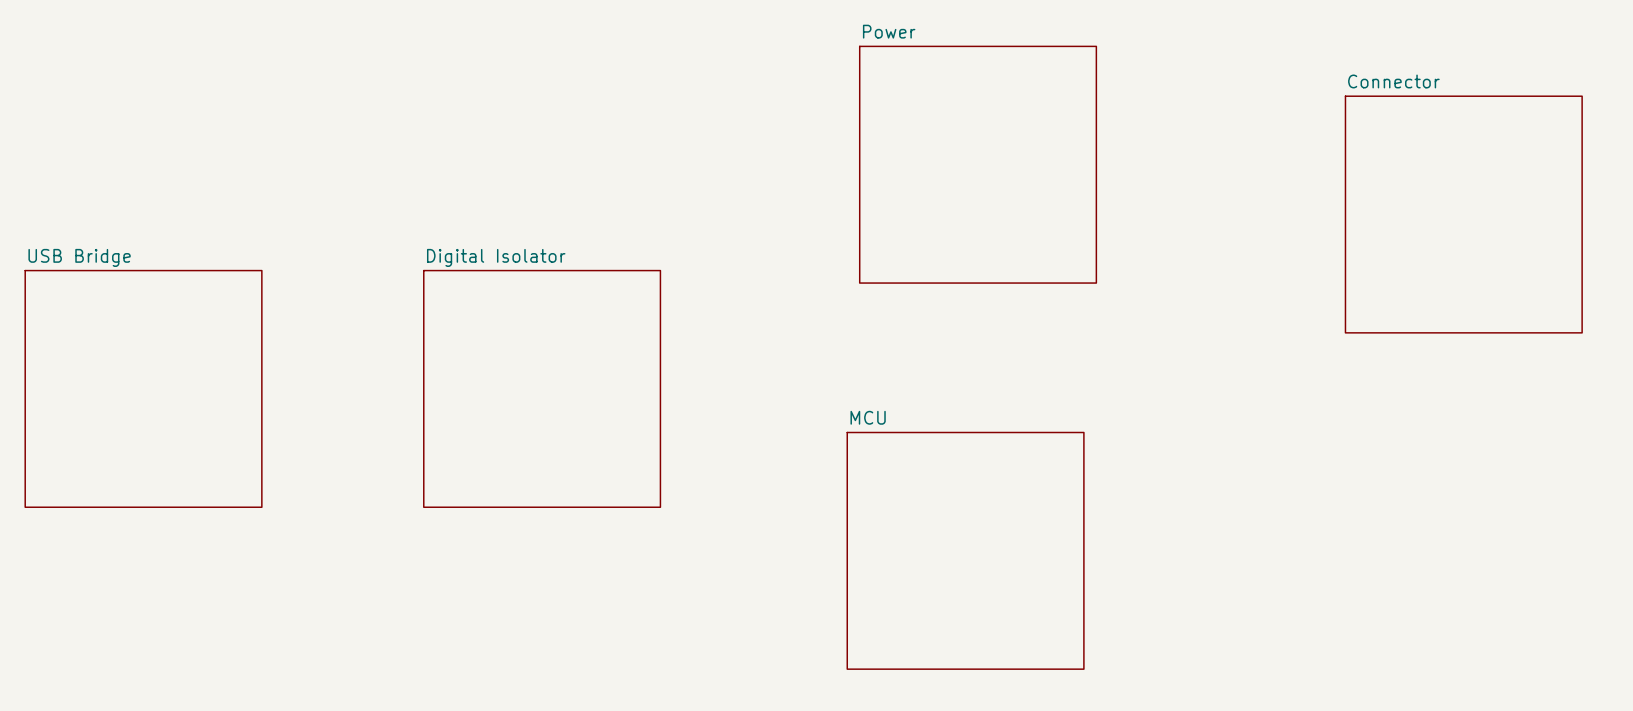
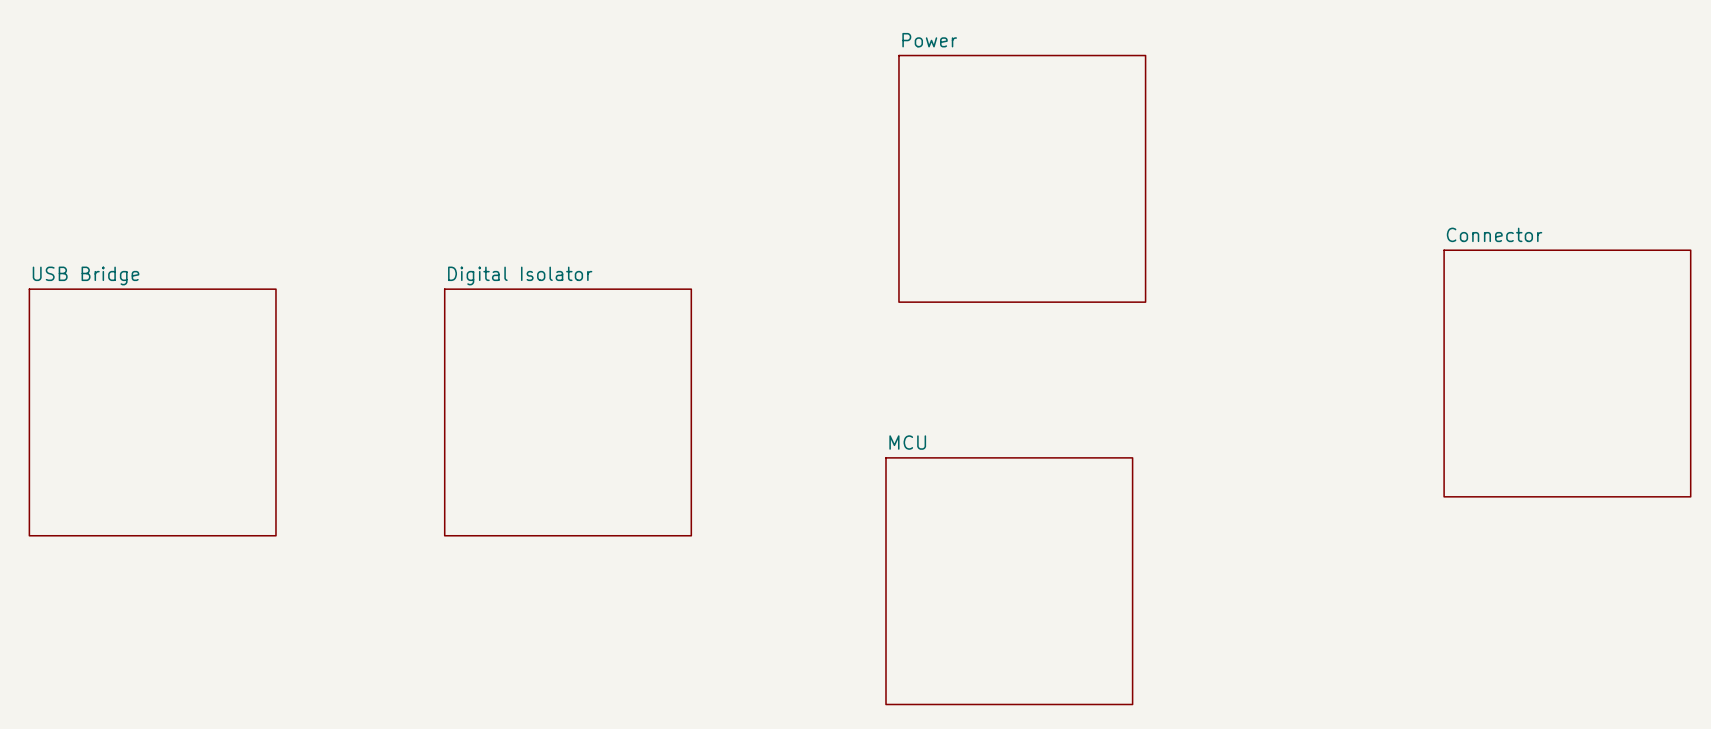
sheet Connector position: (1463, 214) -> (1567, 373)

